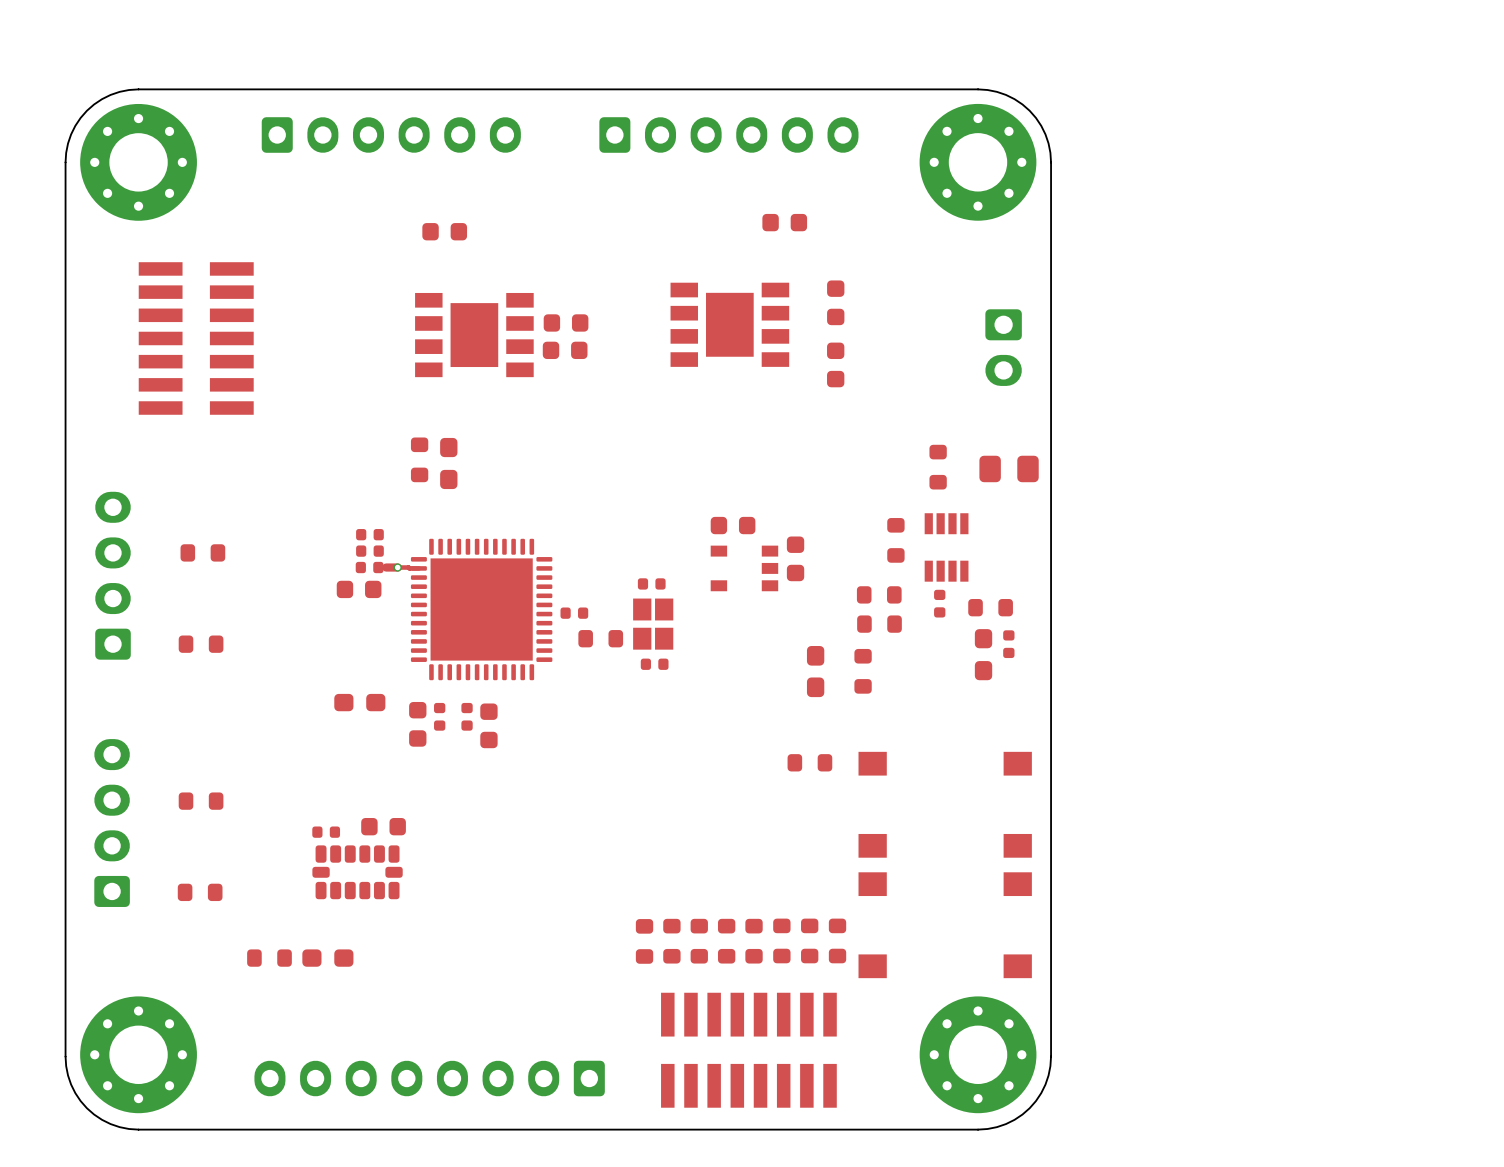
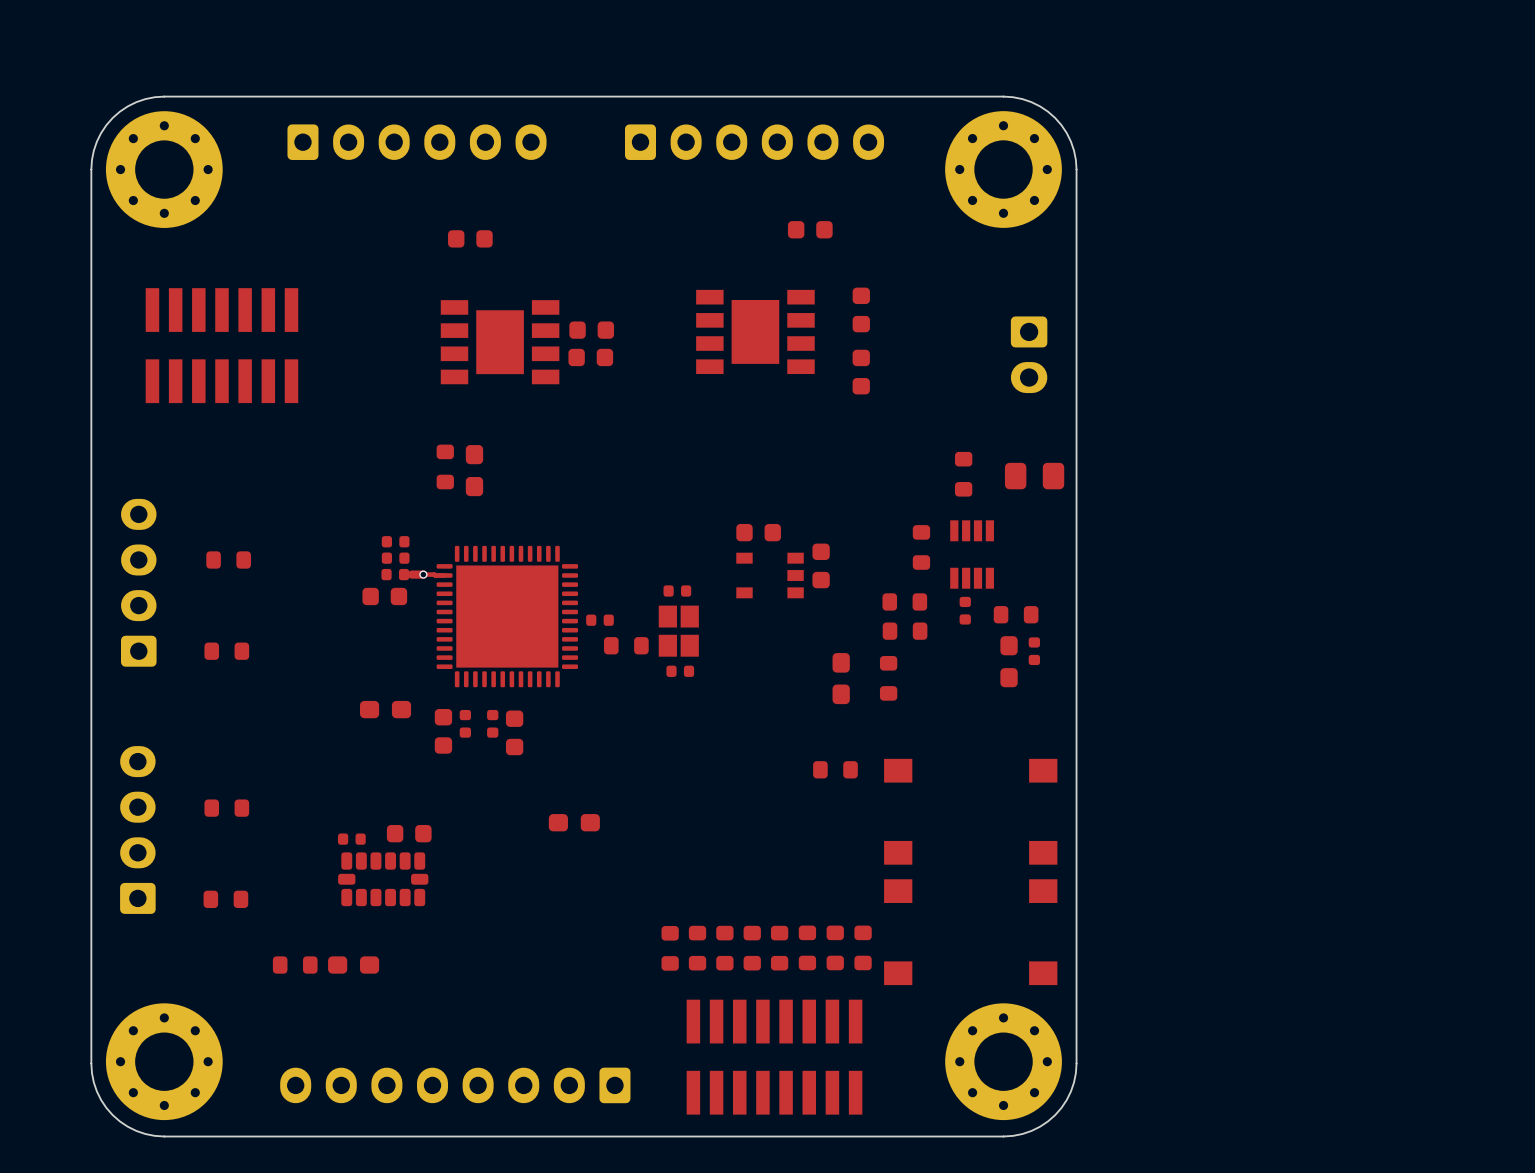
part rotation: 0° (196, 338) -> 90° clockwise (221, 345)
part: none -> (574, 822)

